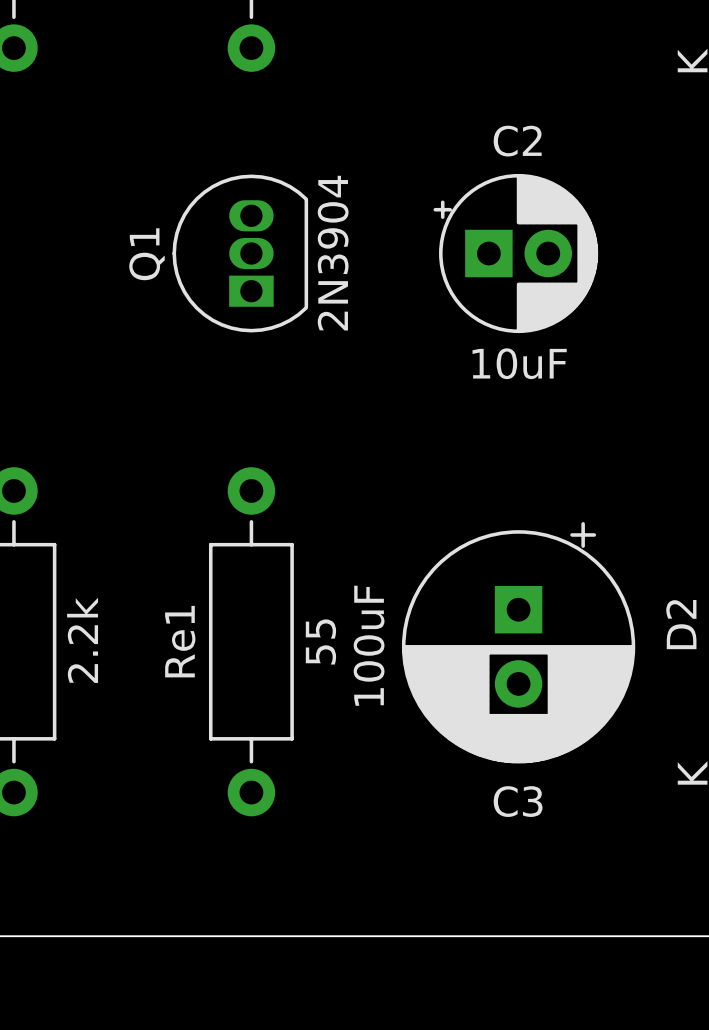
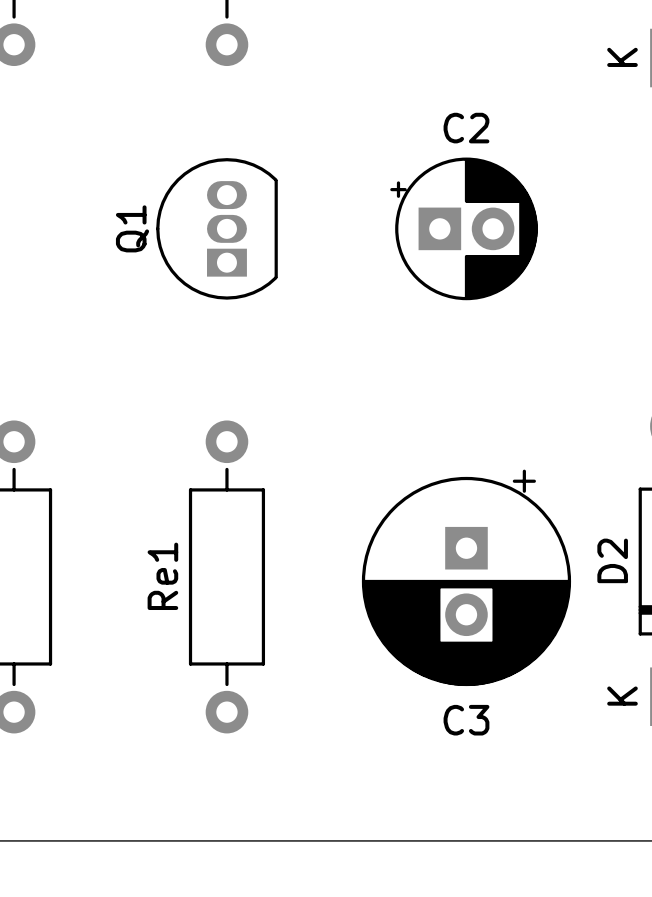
Q1 value: 2N3904 (333, 253) -> none
C2 value: 10uF (519, 363) -> none
part value: 2.2k (82, 640) -> none
Re1 value: 55 (320, 641) -> none
C3 value: 100uF (369, 645) -> none

